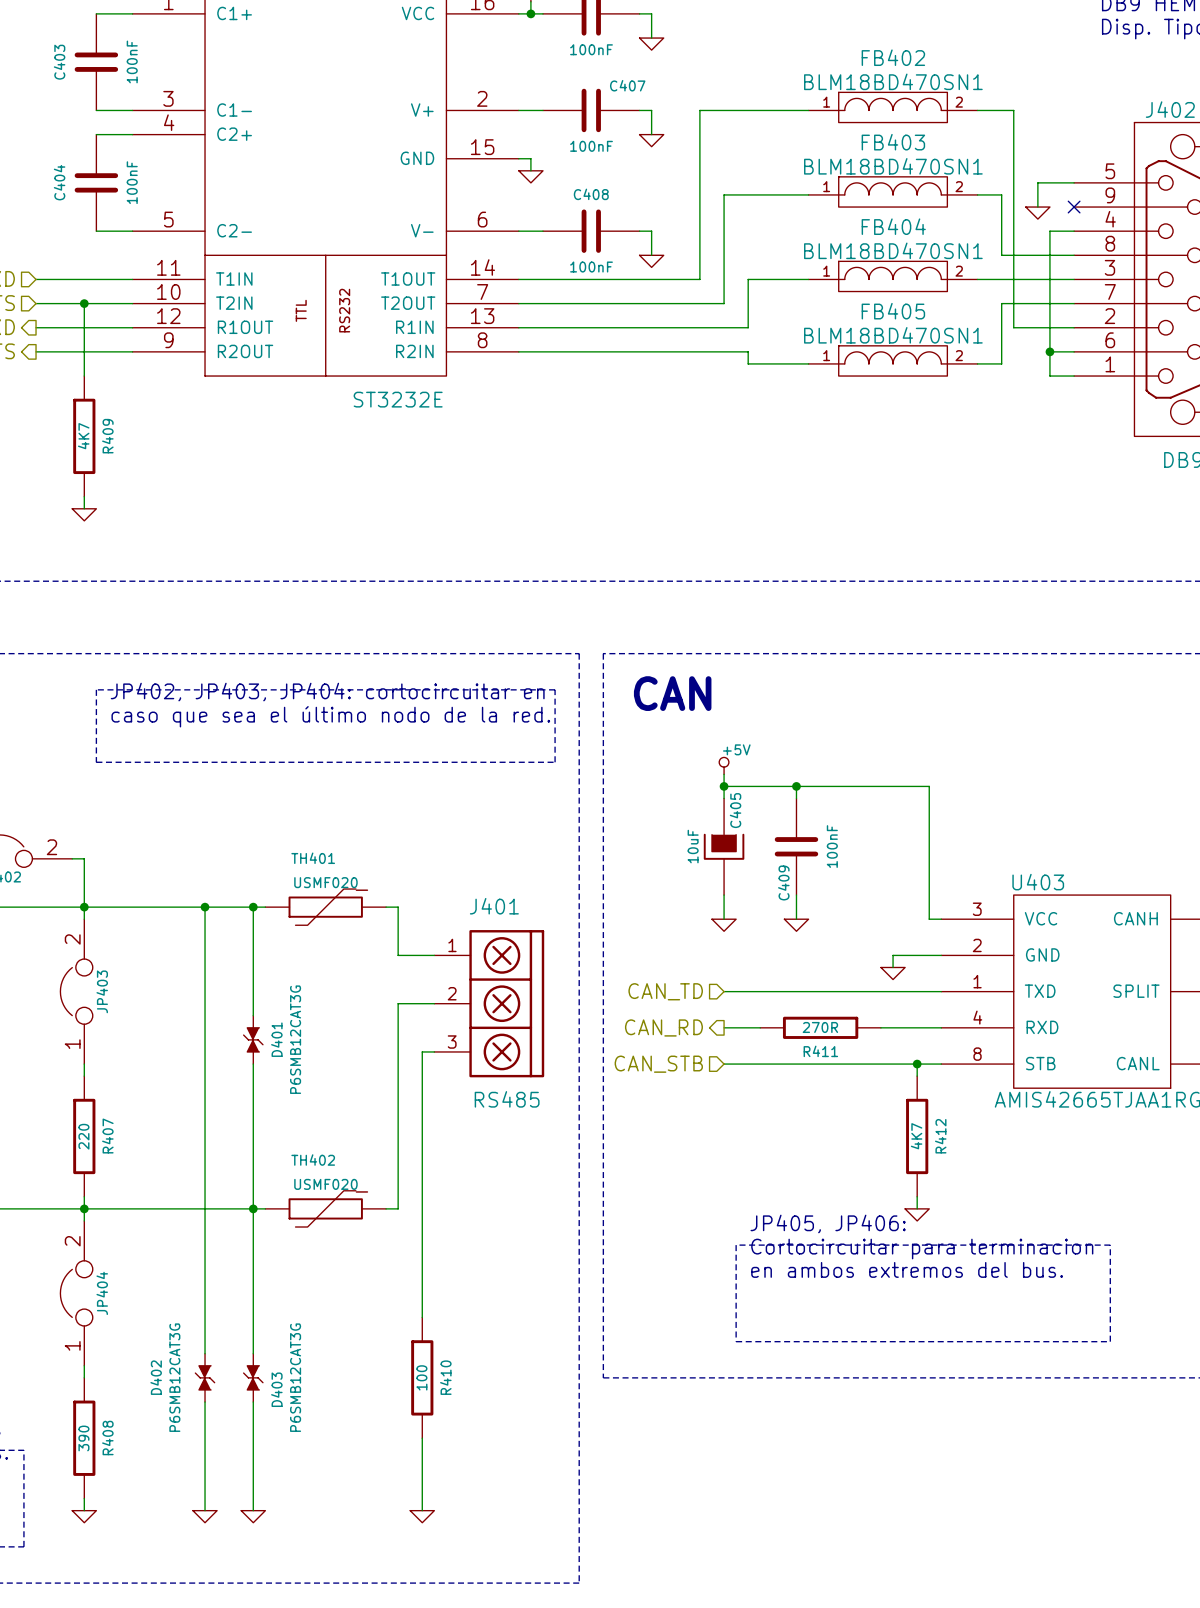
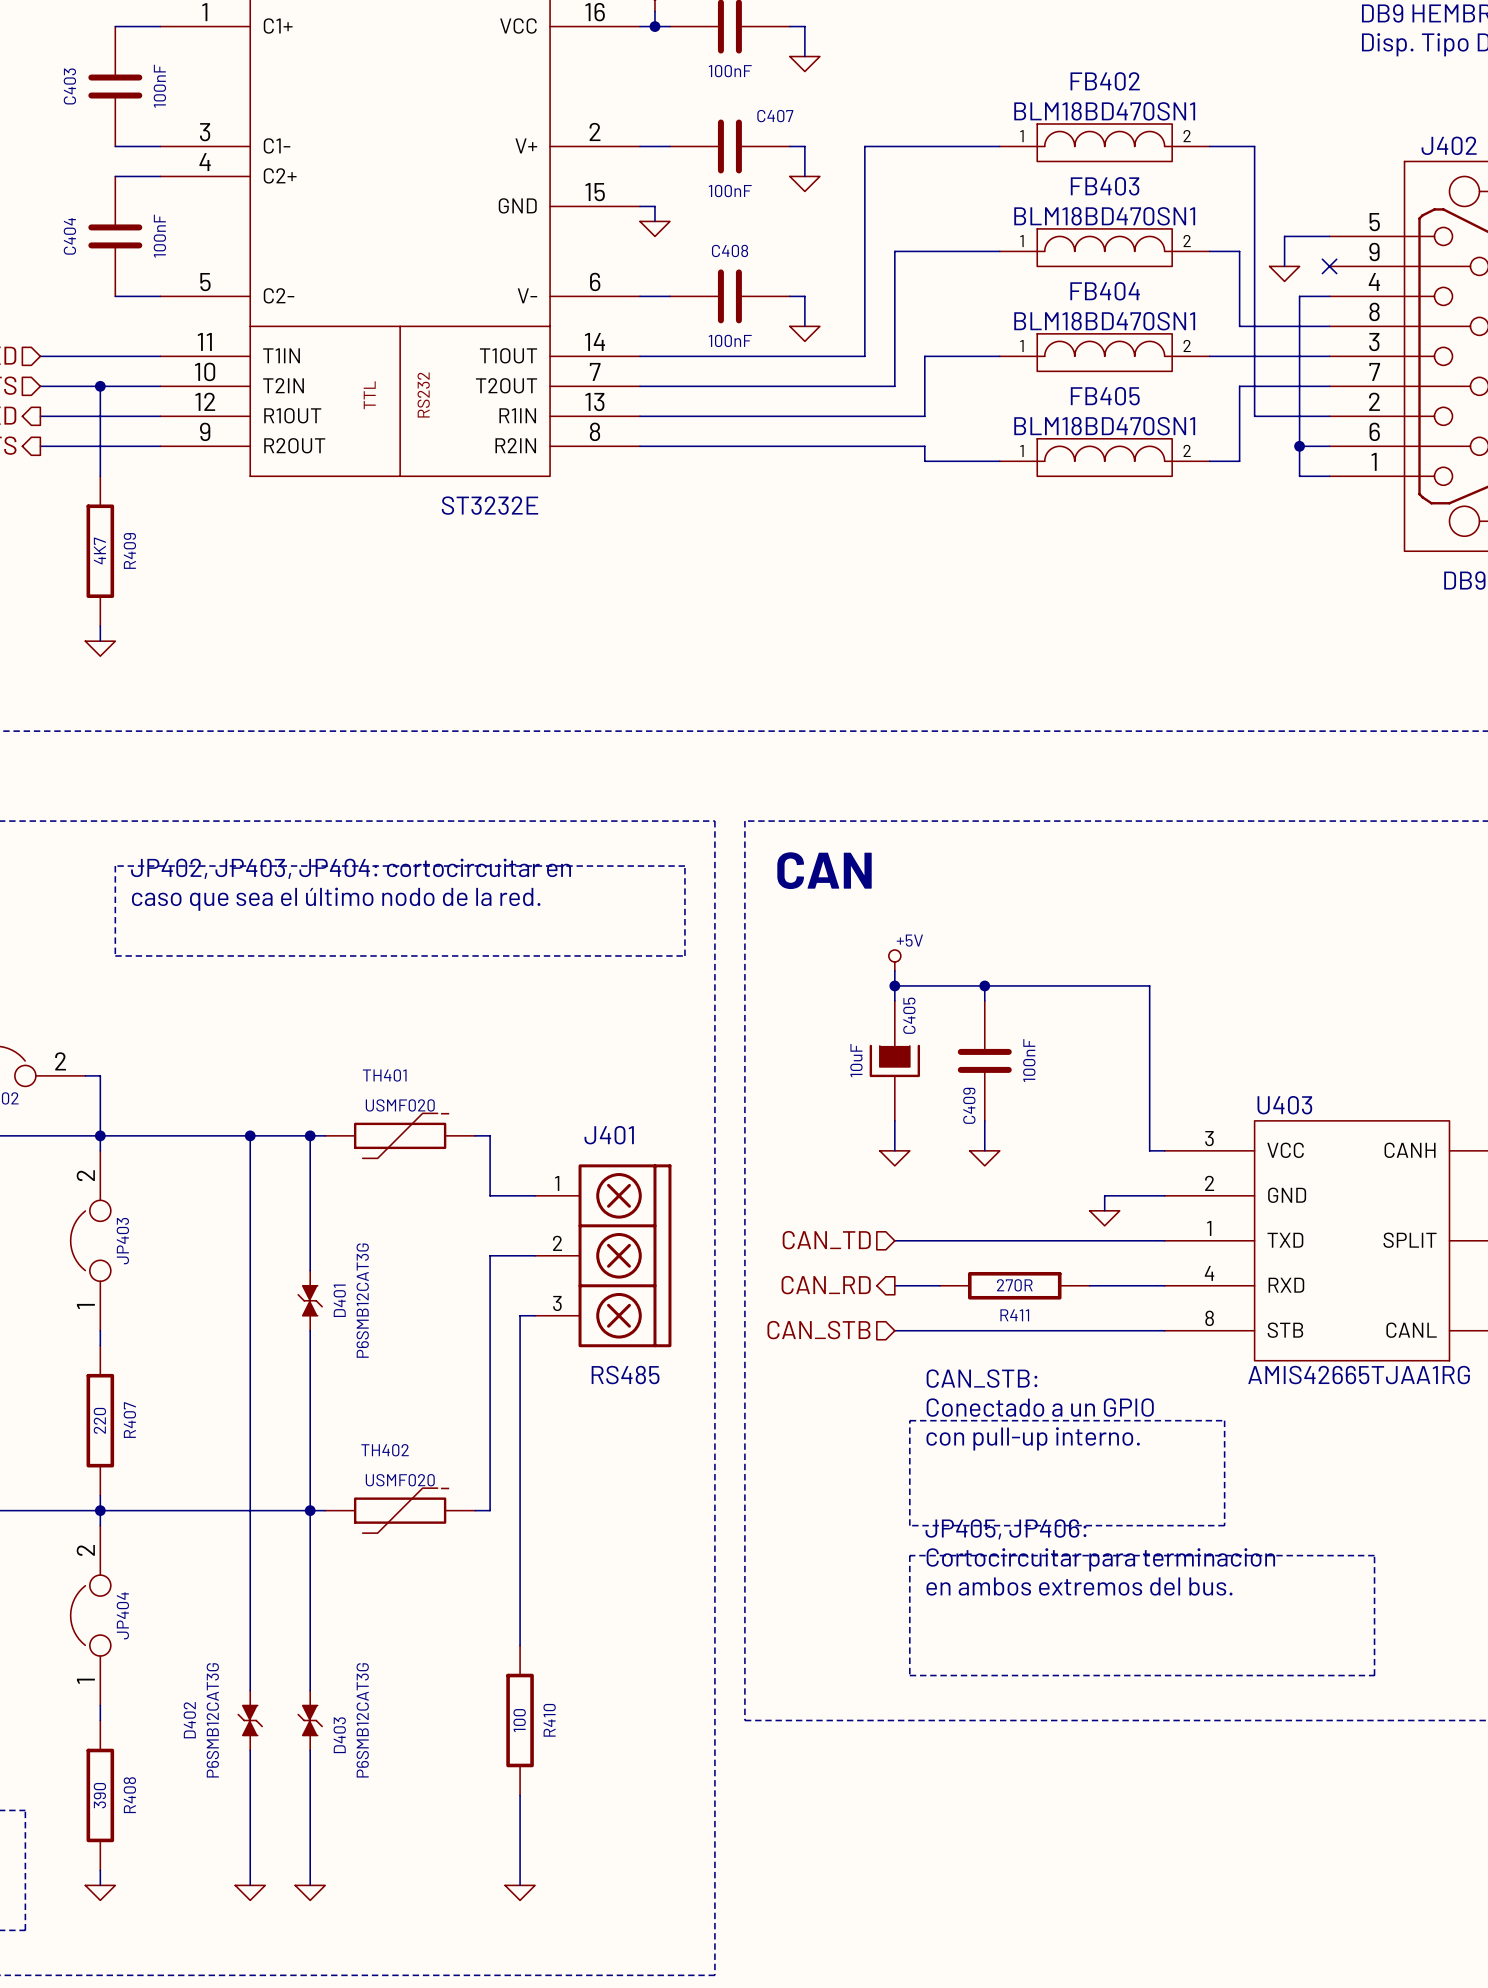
wire: (917, 1064) (917, 1076) -> none
junction: (917, 1064) -> none
text: none -> CAN_STB: (982, 1378)
text: none -> Conectado a un GPIO (1040, 1407)
line: none -> (909, 1420) (1224, 1420) (1224, 1525) (909, 1525) (909, 1420)
R412: 4K7 (917, 1136) -> none
text: none -> con pull-up interno. (1033, 1438)
wire: (917, 1196) (917, 1208) -> none
power symbol: (917, 1214) -> none

